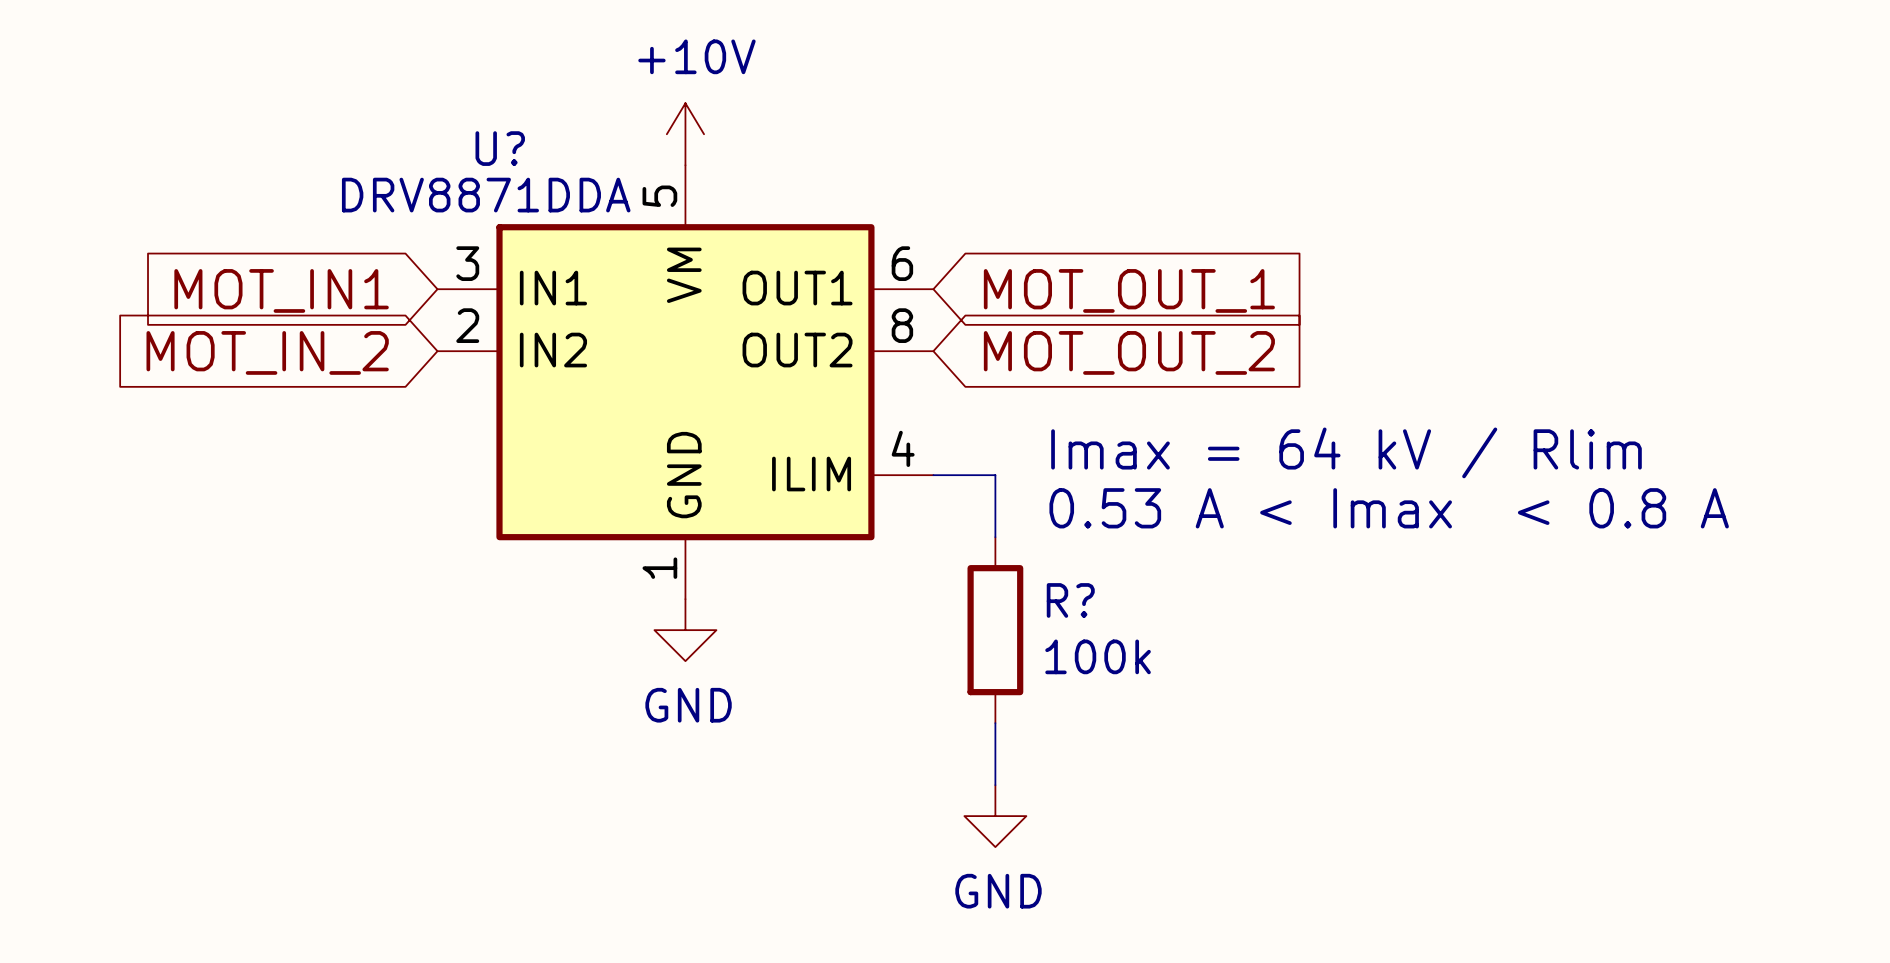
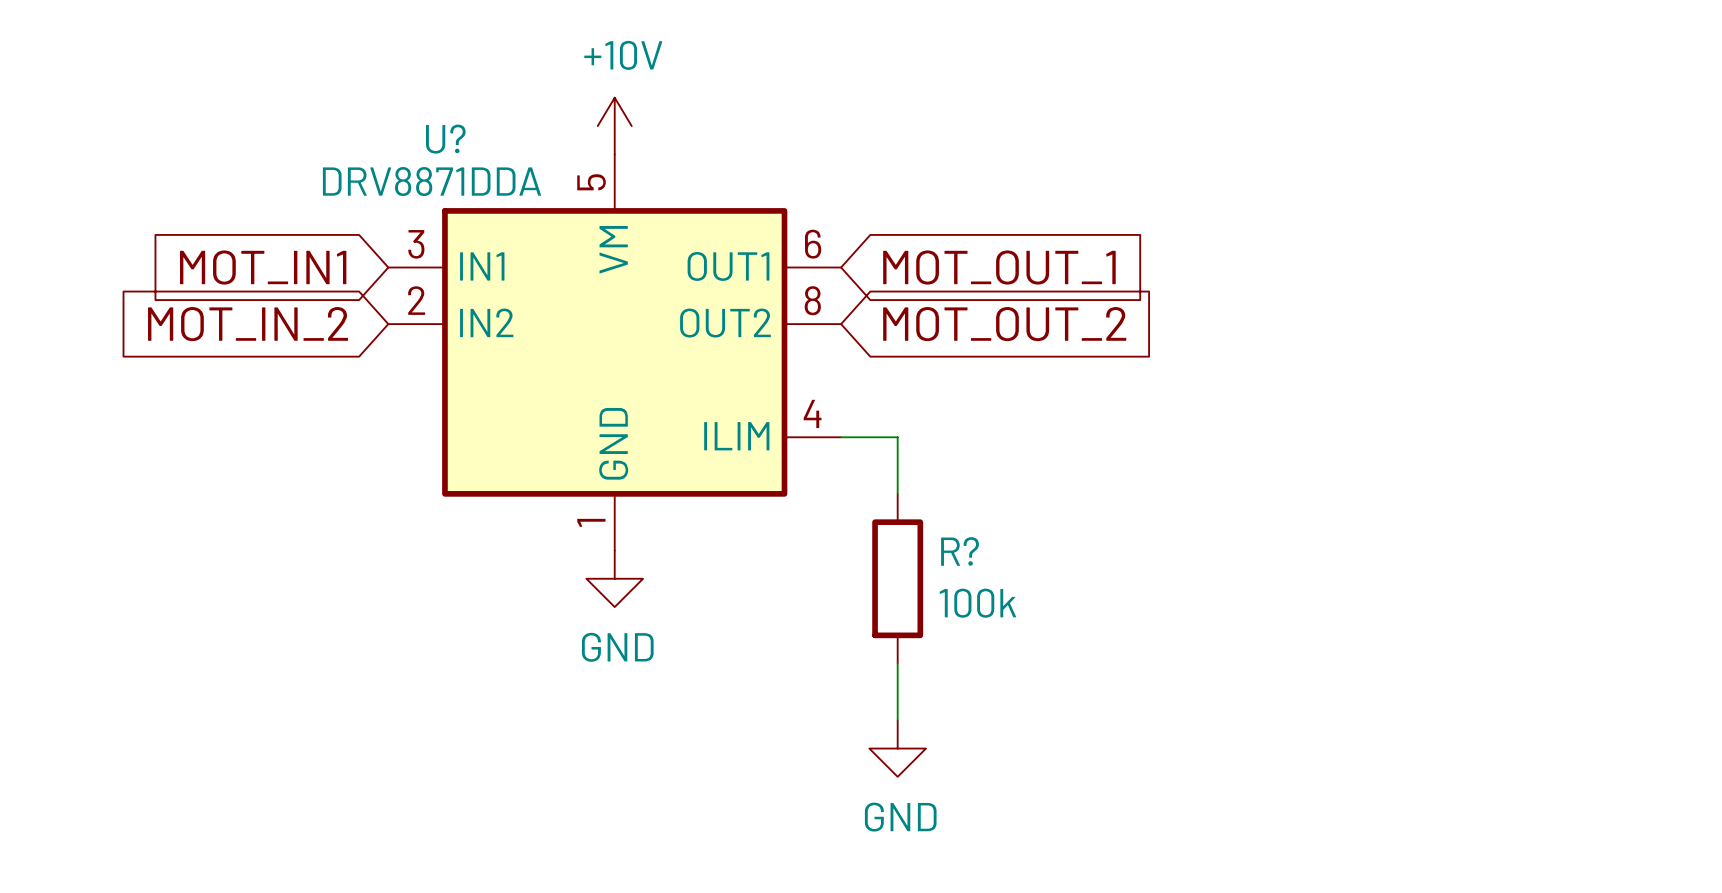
text: Imax = 64 kV / Rlim (1346, 452) -> none
text: 0.53 A < Imax < 0.8 A (1389, 508) -> none

